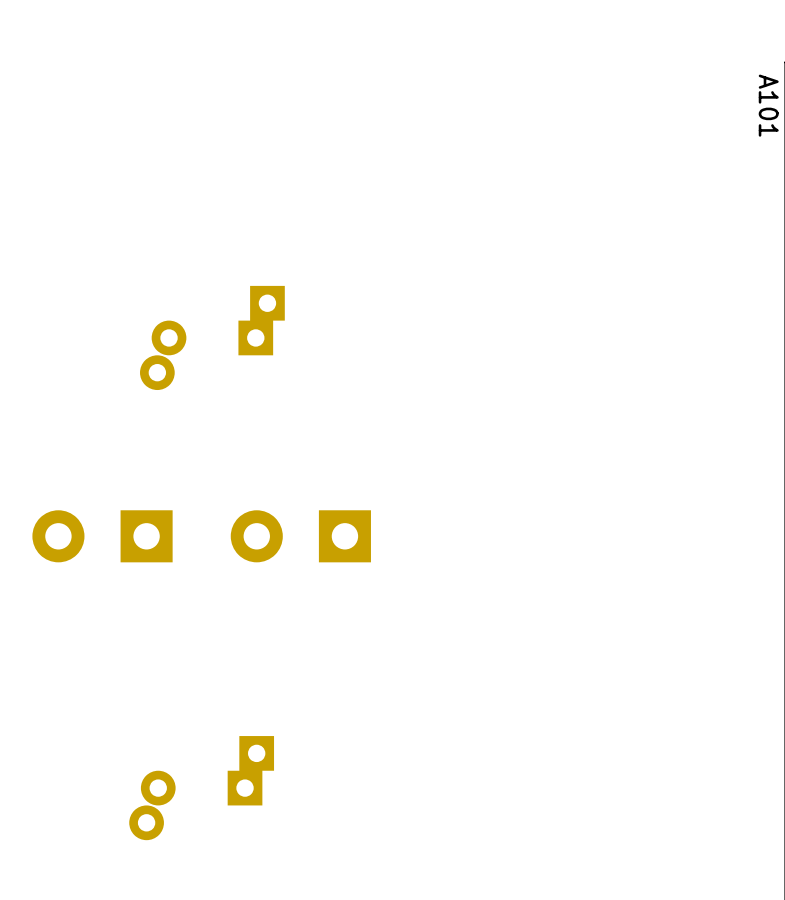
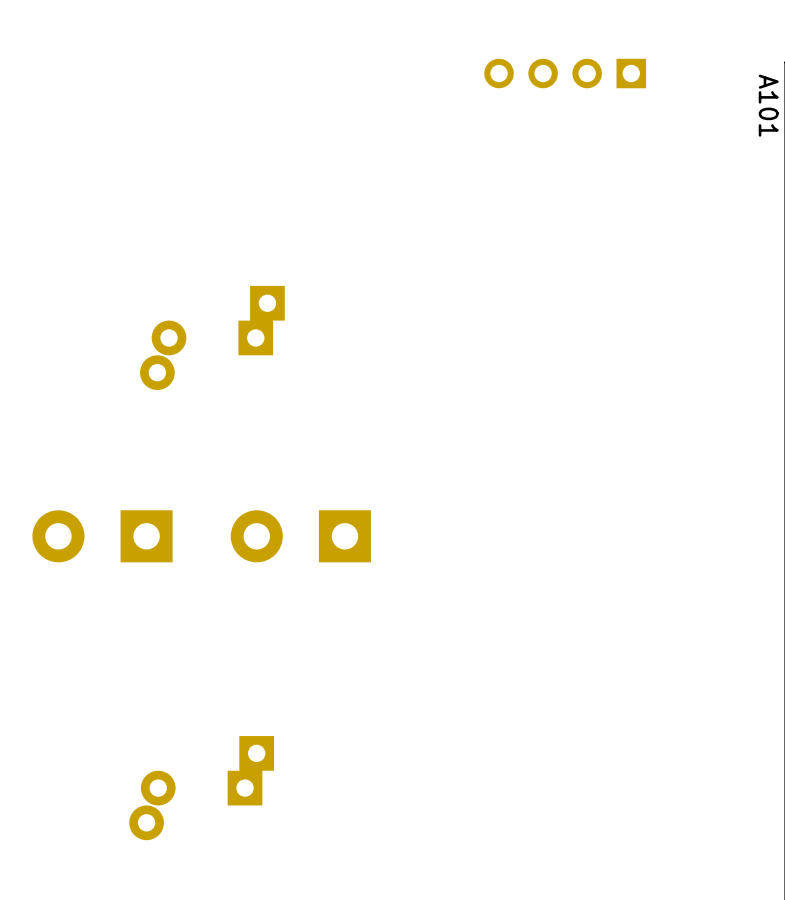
part: none -> (565, 73)

